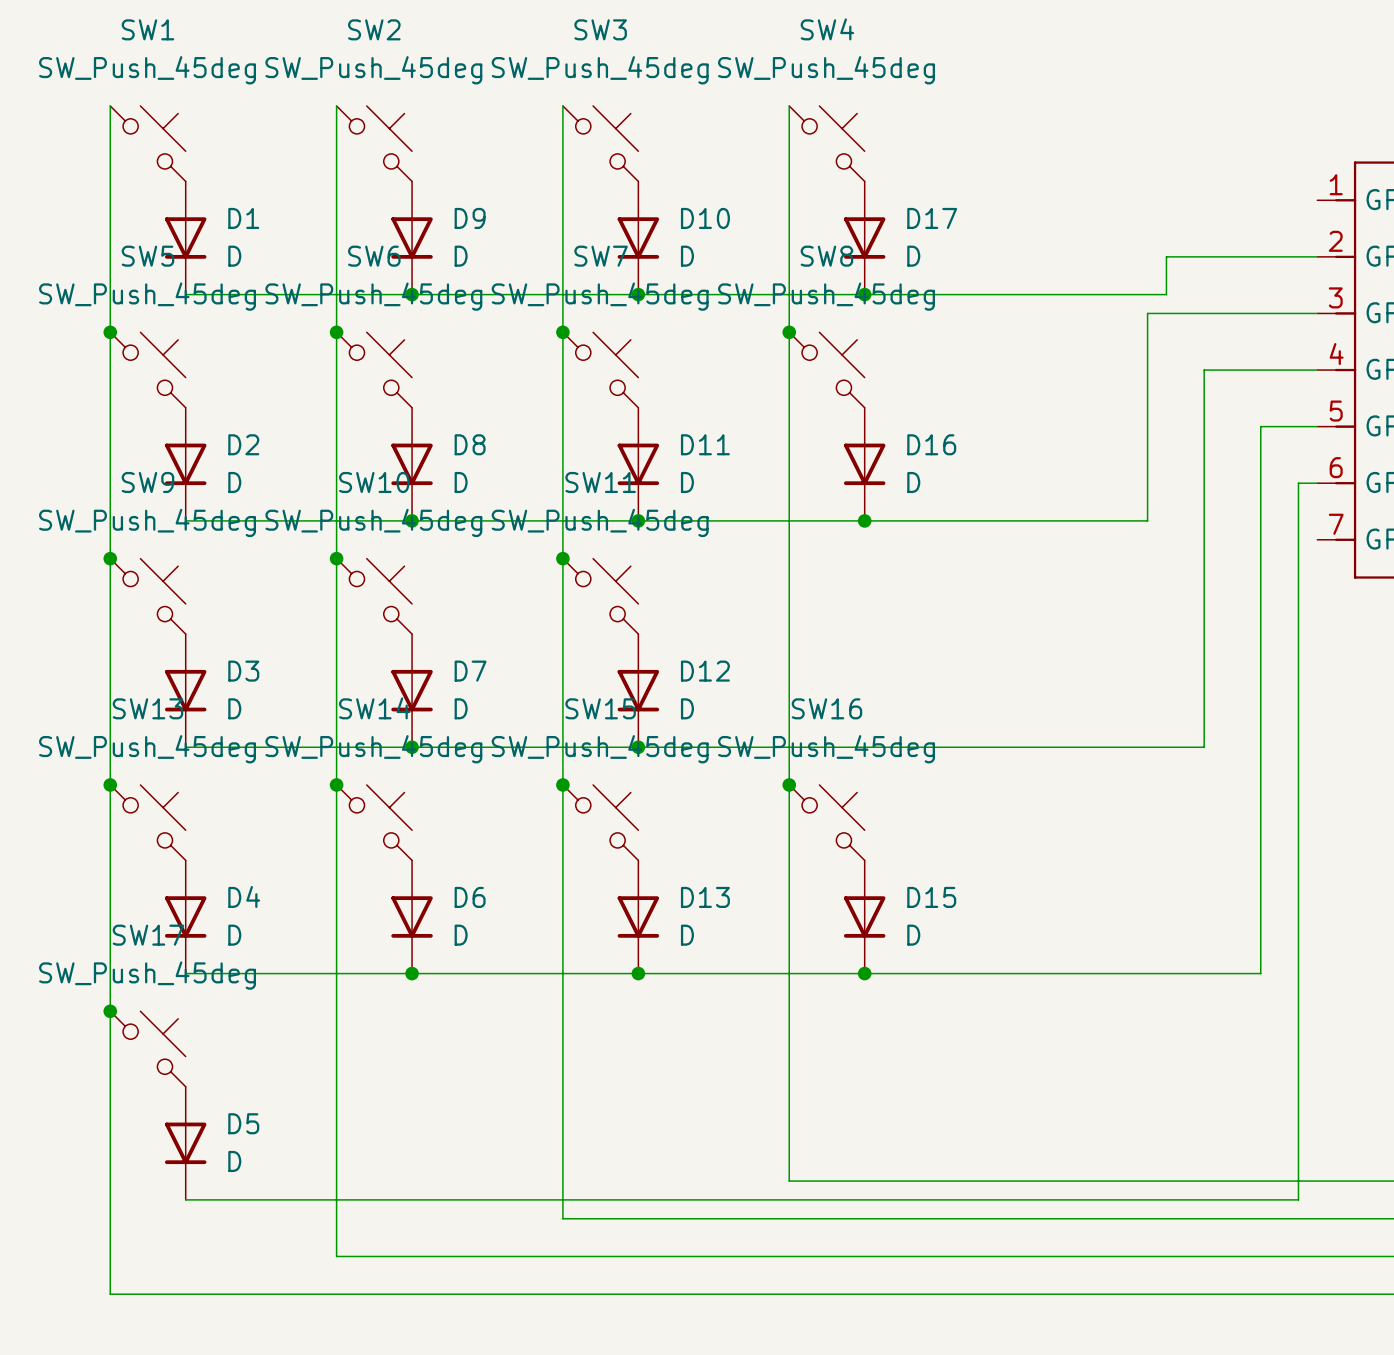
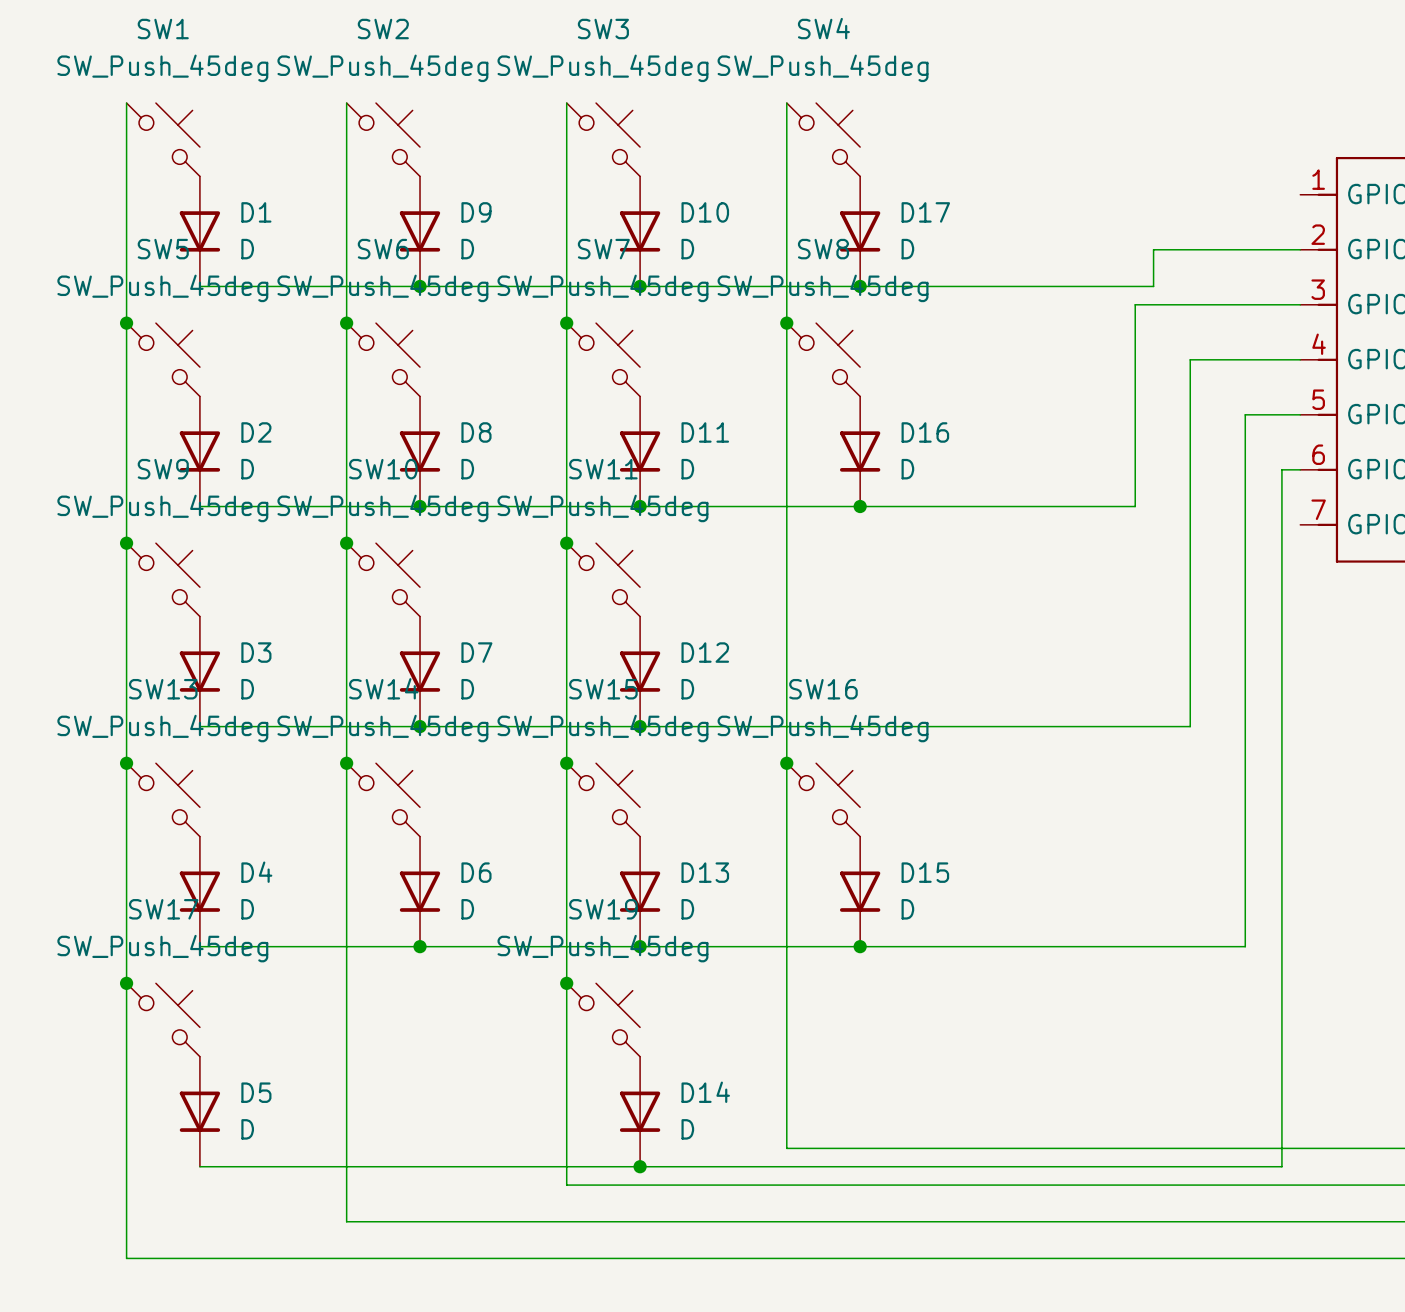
junction: none -> (566, 983)
SW19: none -> SW_Push_45deg (603, 1020)
D14: none -> D (640, 1111)
junction: none -> (640, 1166)

